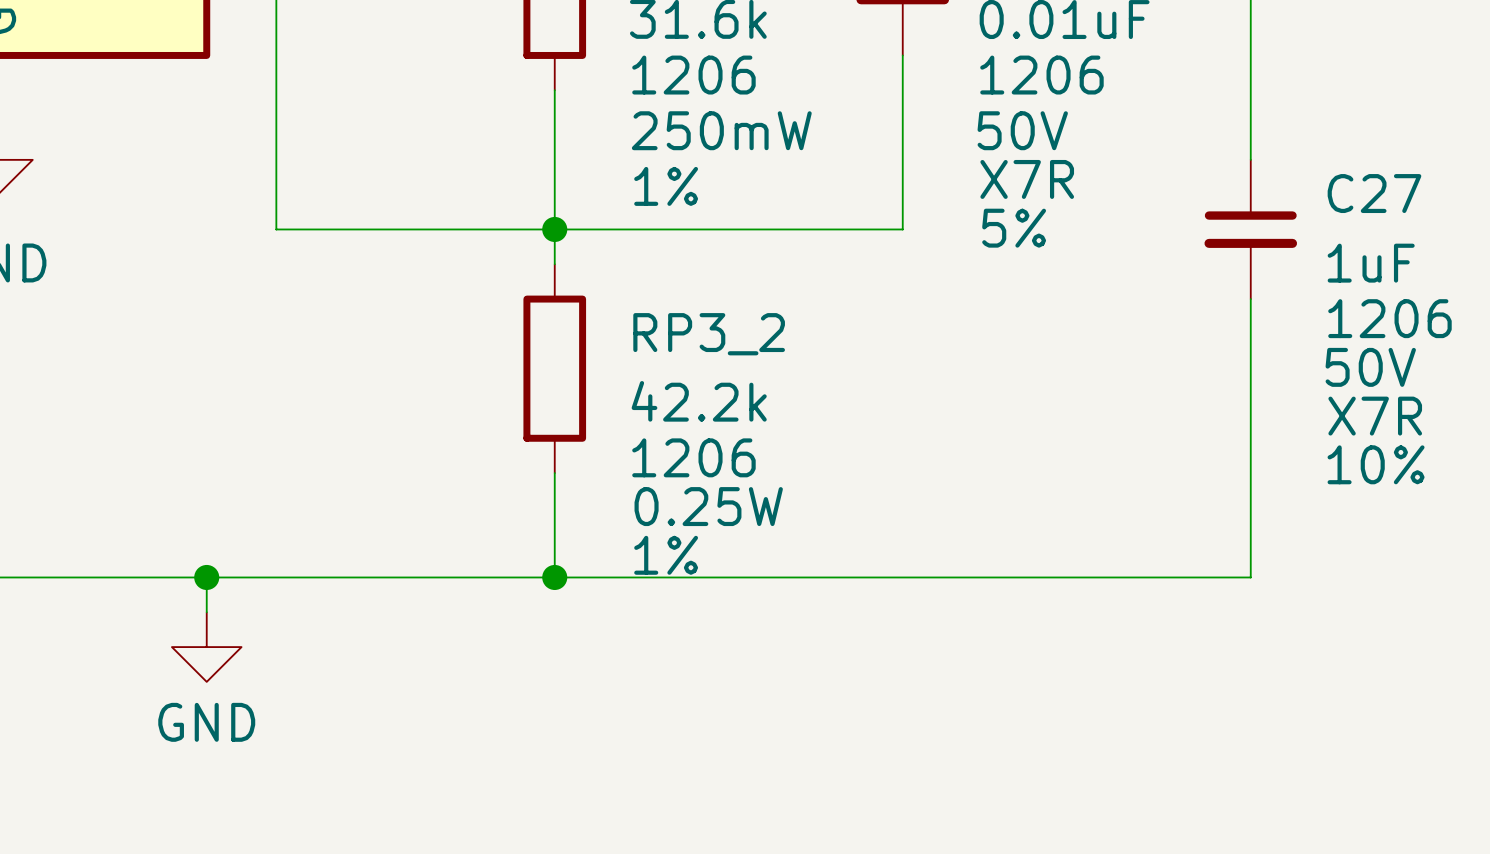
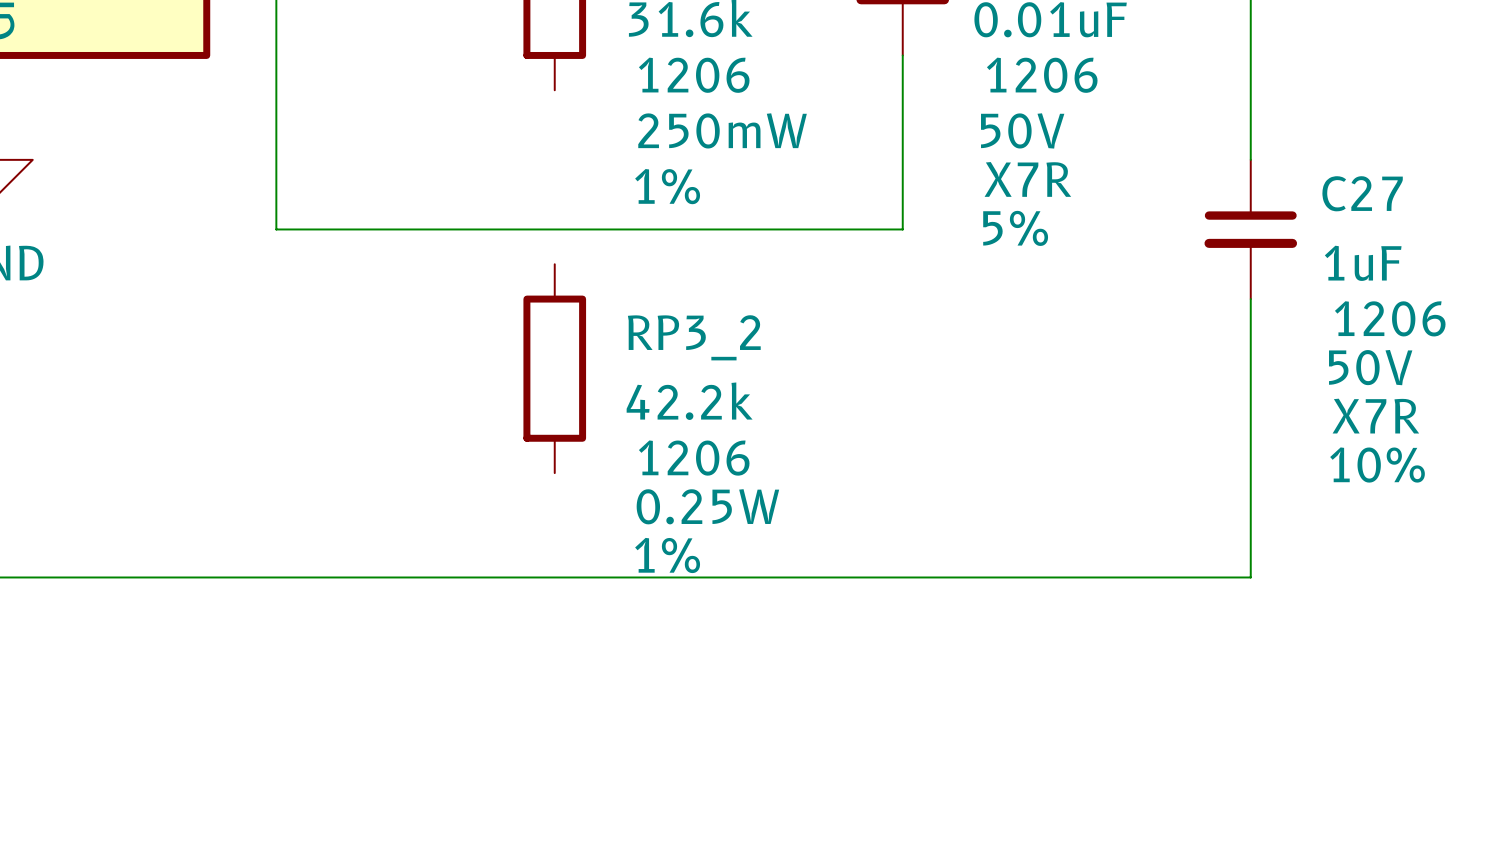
wire: (554, 90) (554, 264) -> none
junction: (554, 229) -> none
wire: (554, 473) (554, 577) -> none
wire: (206, 577) (206, 612) -> none
junction: (206, 577) -> none
junction: (554, 577) -> none
power symbol: GND (206, 647) -> none

